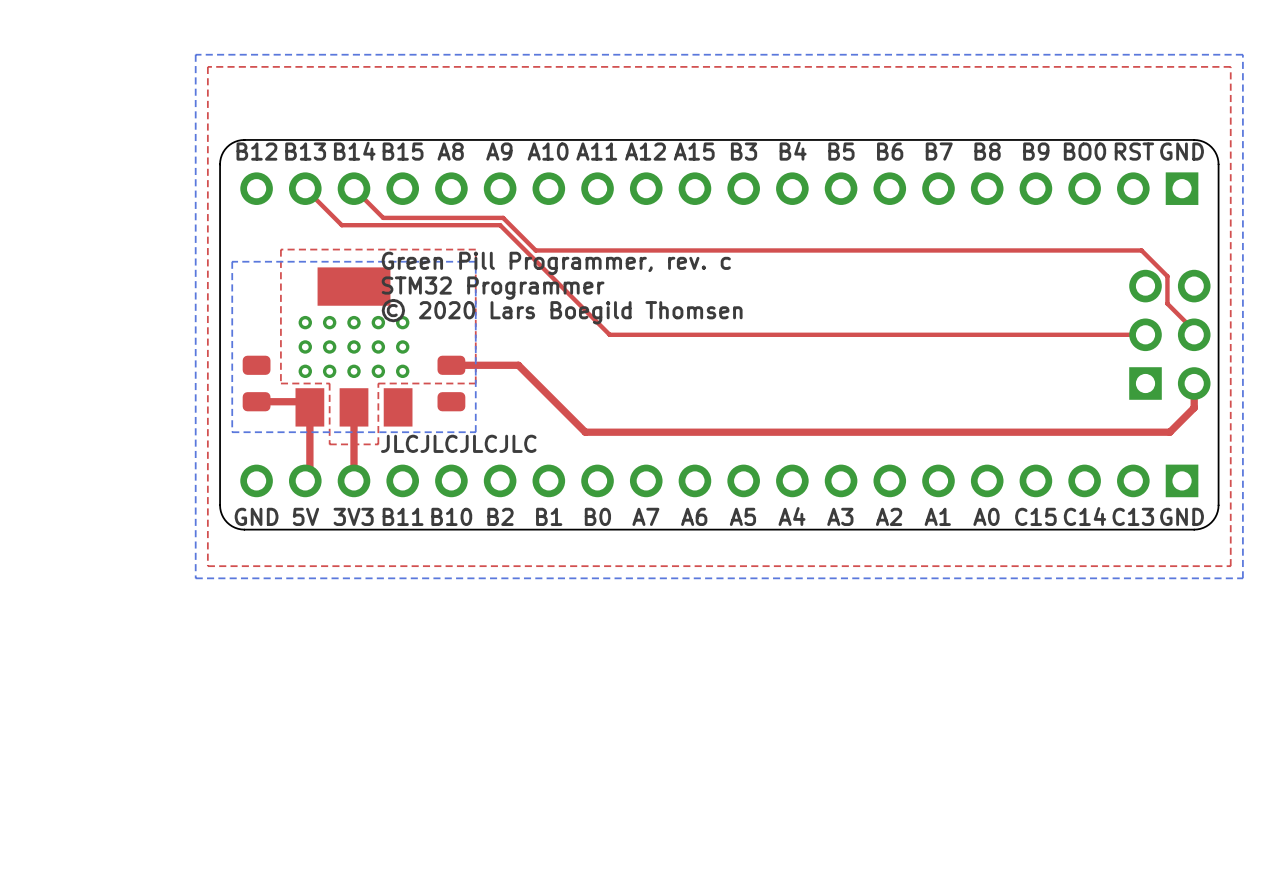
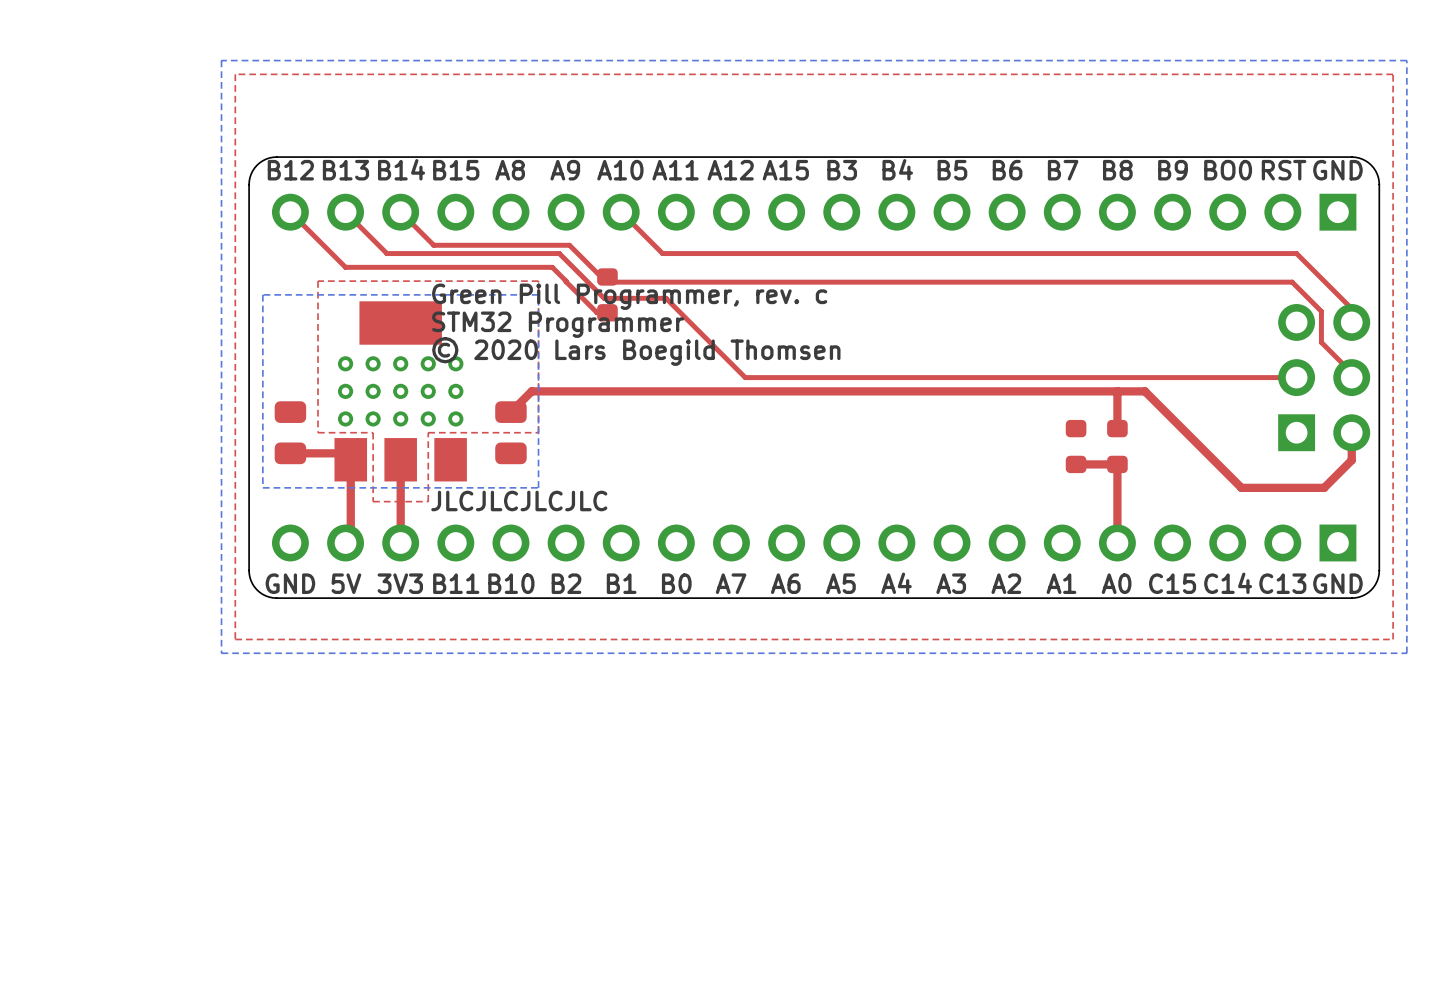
top track: none -> (290, 212) (345, 267) (552, 267) (597, 312) (607, 312)
top track: none -> (621, 212) (662, 253) (1296, 253) (1351, 308) (1351, 322)
top track: (494, 225) (500, 225) (609, 334) (658, 334) -> (559, 253) (604, 298) (666, 298) (745, 377)
part: none -> (607, 294)
top track: none -> (1117, 391) (1117, 428)
top track: (451, 365) (518, 365) (585, 432) (1096, 432) -> (510, 412) (531, 391) (1144, 391) (1241, 487)
part: none -> (1076, 446)
part: none -> (1117, 446)
top track: none -> (1076, 464) (1117, 464) (1117, 542)

